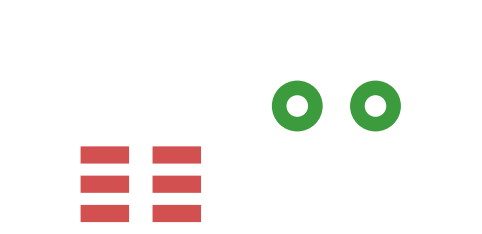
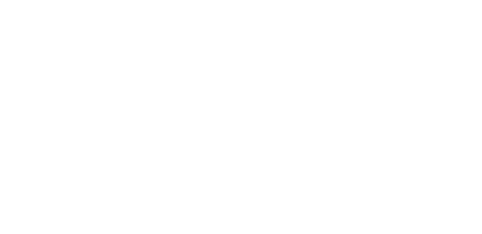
part: (336, 106) -> none
part: (140, 184) -> none

